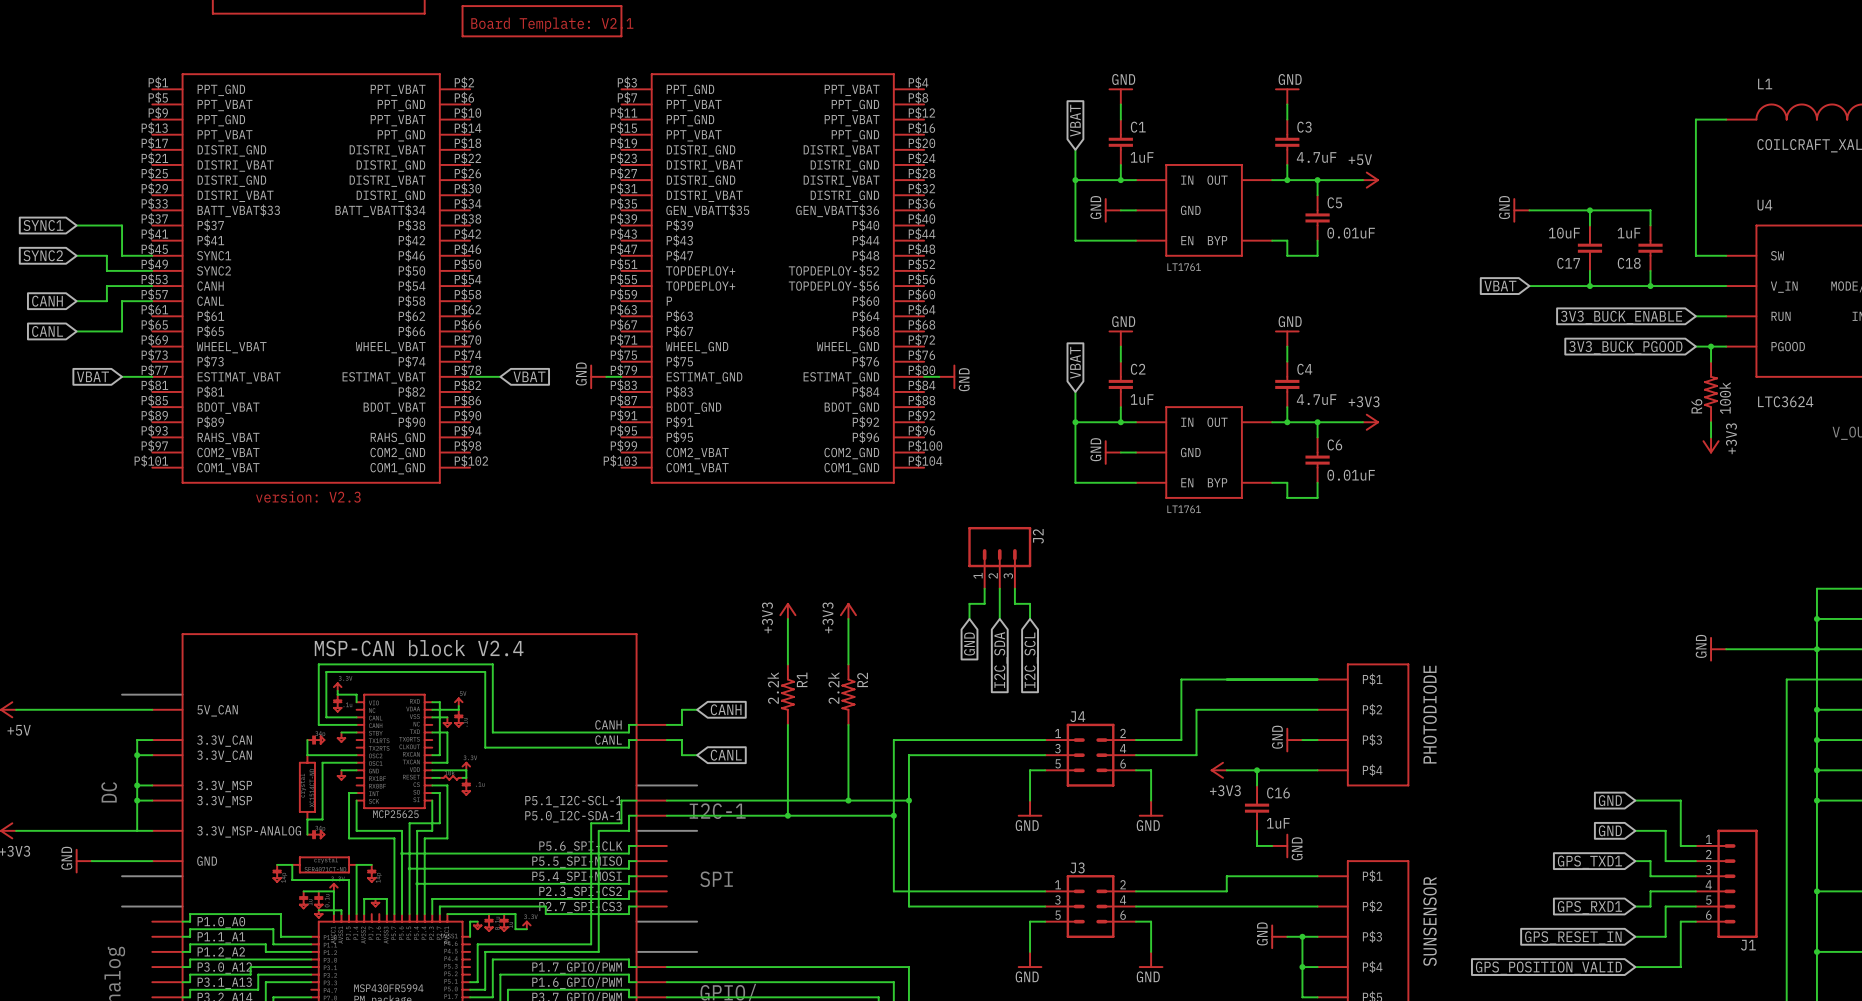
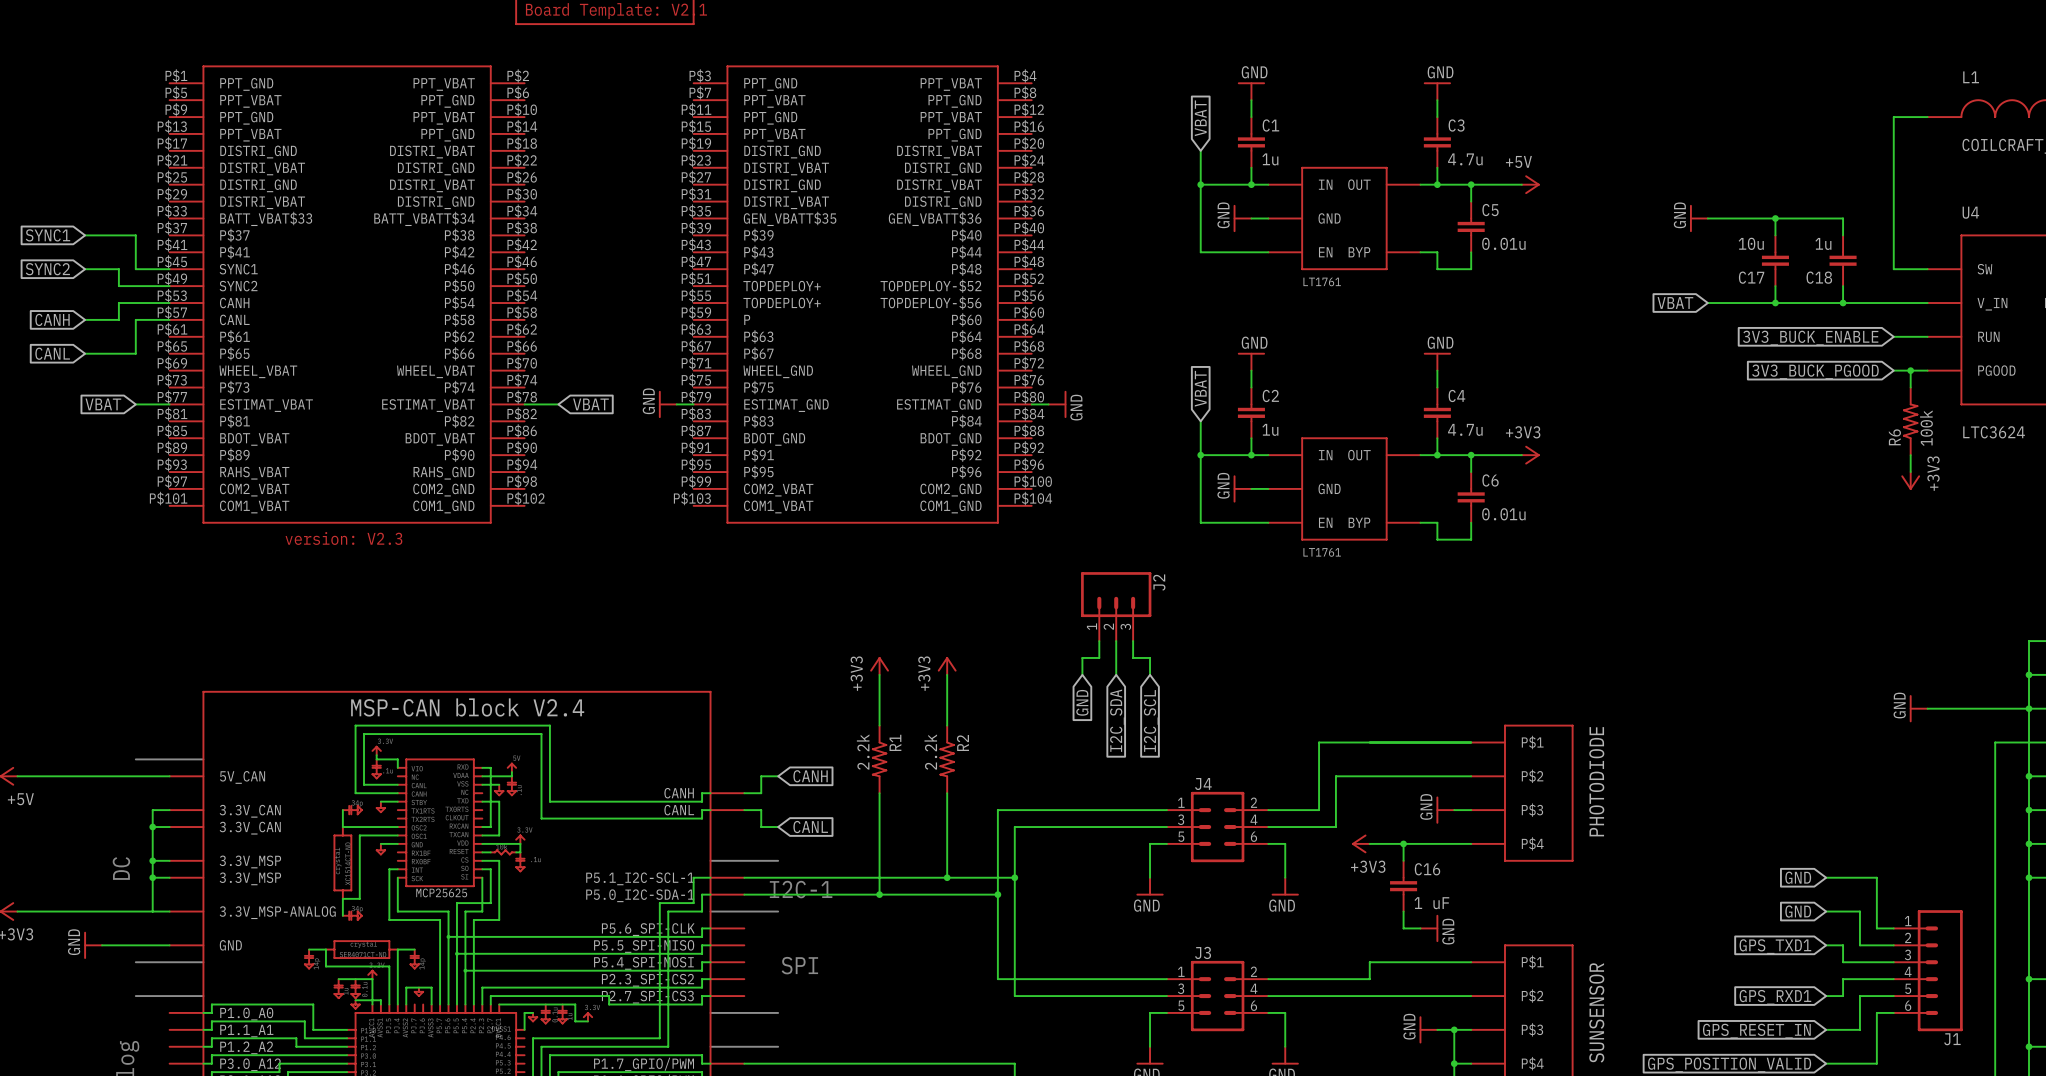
C1 value: 1uF (1142, 157) -> 1u (1270, 159)
C3 value: 4.7uF (1316, 157) -> 4.7u (1465, 159)
C5 value: 0.01uF (1351, 233) -> 0.01u (1503, 243)
C17 value: 10uF (1564, 233) -> 10u (1751, 243)
C18 value: 1uF (1629, 233) -> 1u (1823, 243)
C2 value: 1uF (1142, 399) -> 1u (1270, 429)
C4 value: 4.7uF (1316, 399) -> 4.7u (1465, 429)
C6 value: 0.01uF (1351, 475) -> 0.01u (1503, 514)
C16 value: 1uF (1278, 823) -> 1 uF (1431, 903)

